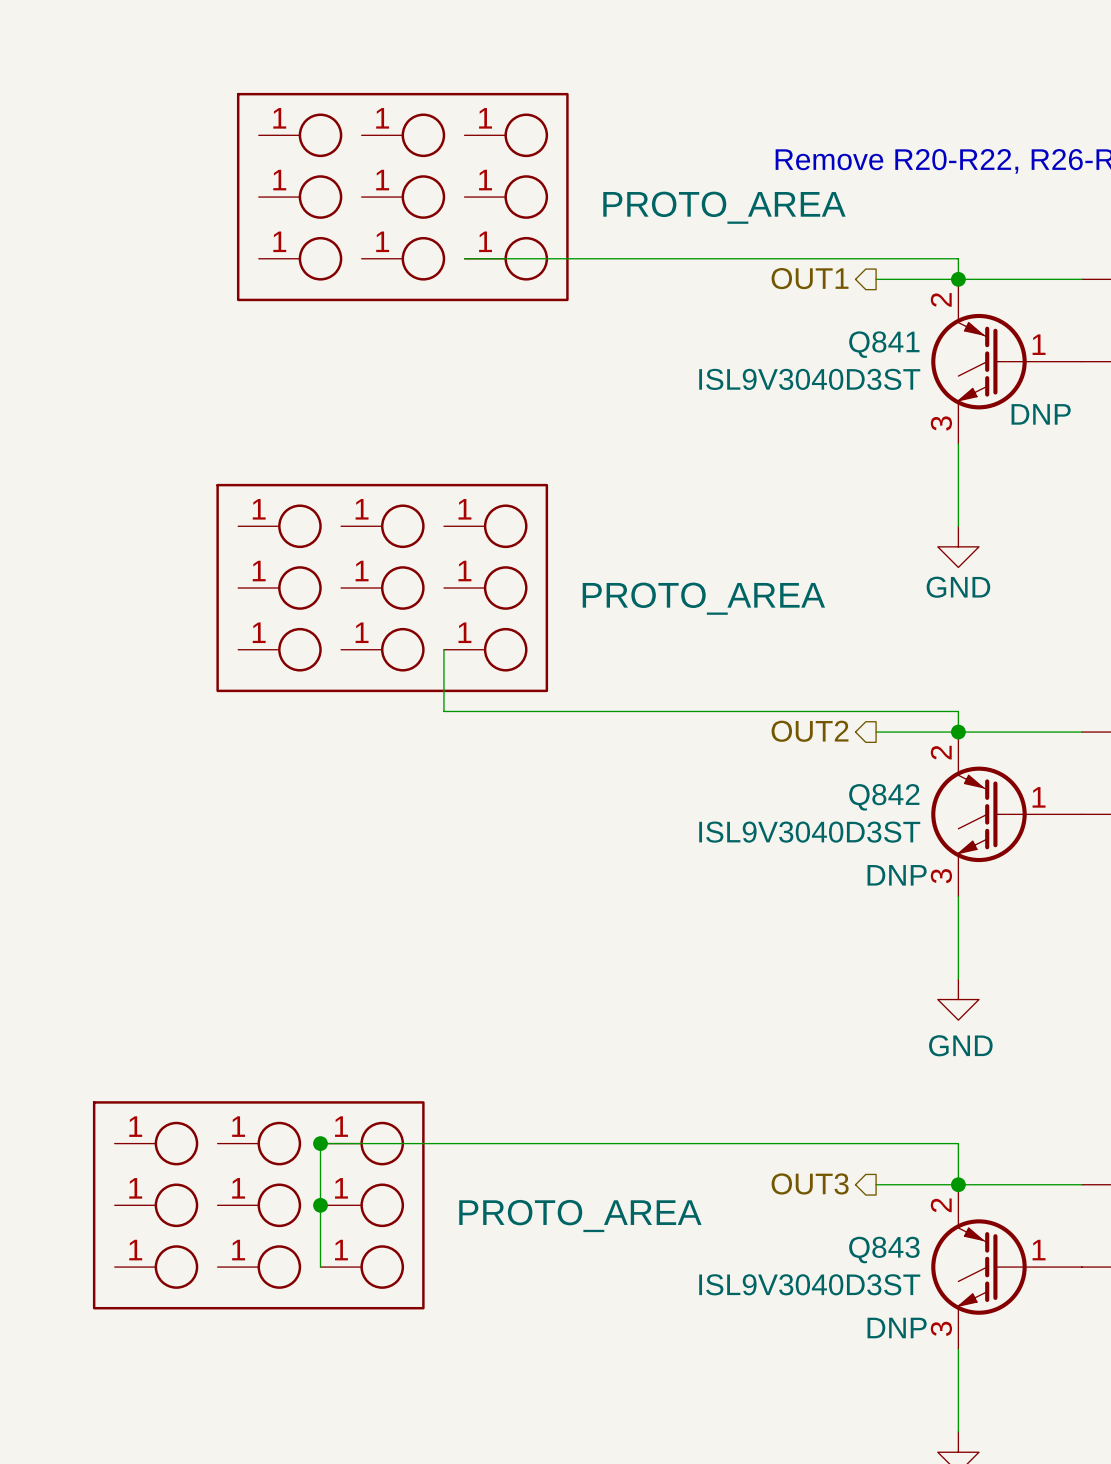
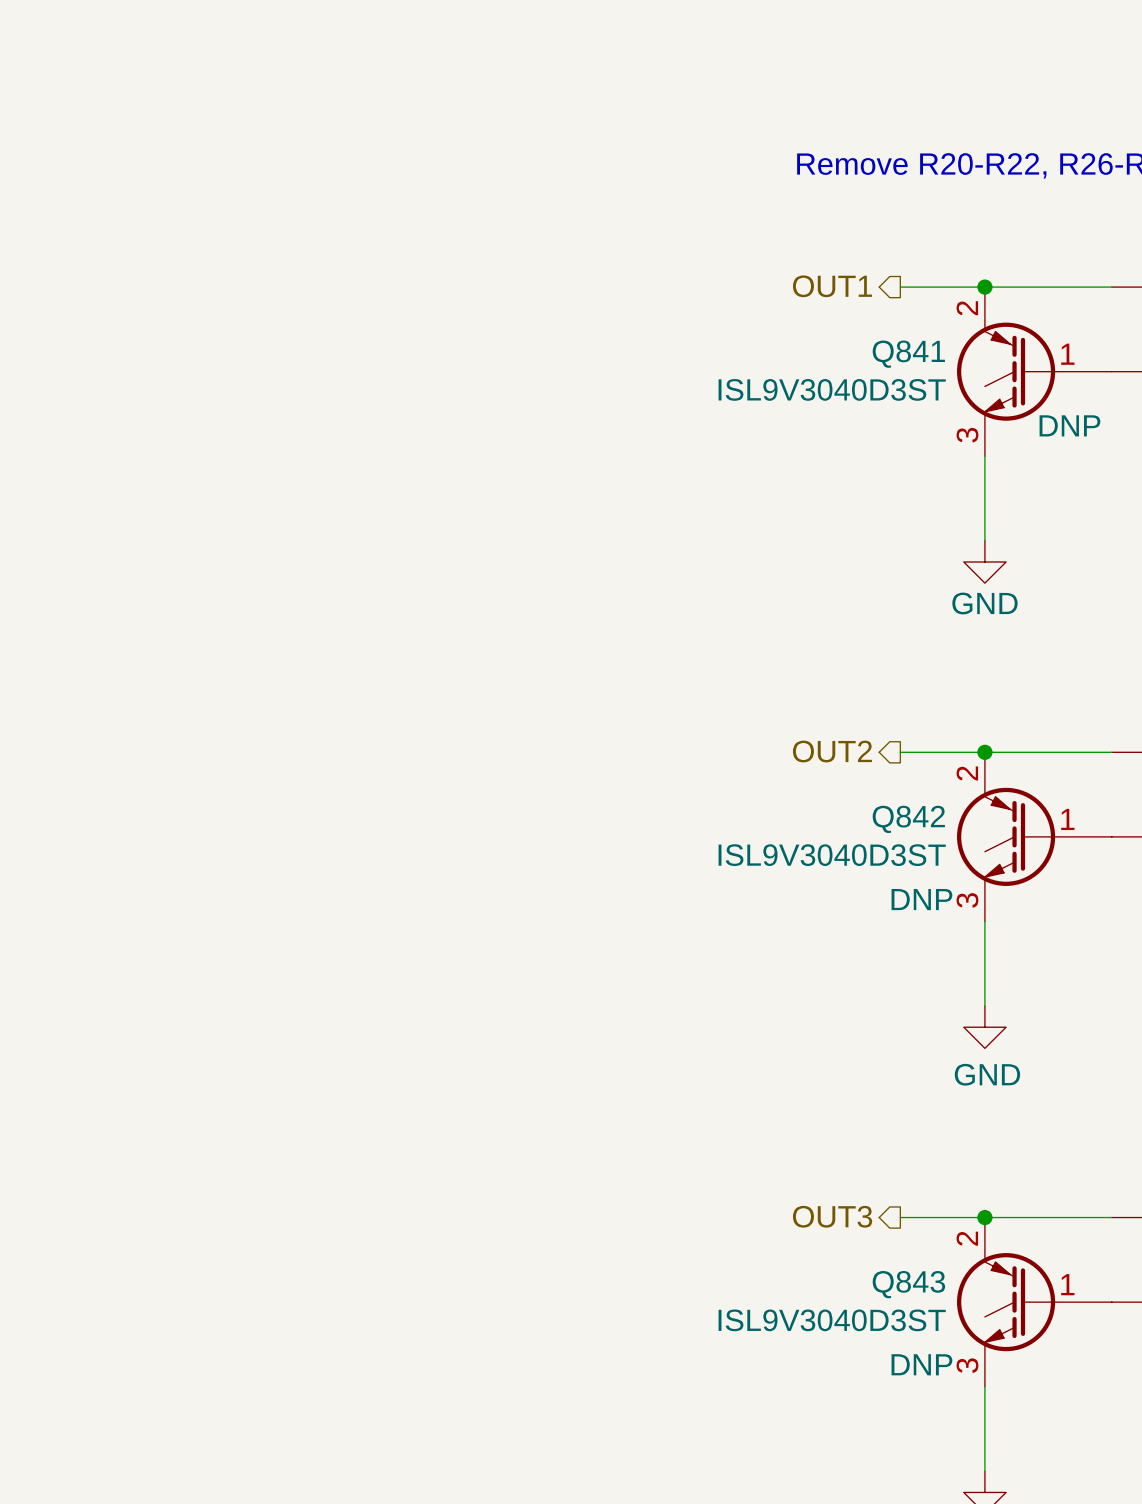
part: PROTO_AREA (402, 197) -> none
wire: (464, 258) (958, 258) (958, 279) -> none
part: PROTO_AREA (382, 588) -> none
wire: (443, 649) (443, 711) (958, 711) (958, 732) -> none
junction: (320, 1143) -> none
wire: (958, 1184) (958, 1143) (320, 1143) (320, 1267) -> none
part: PROTO_AREA (258, 1205) -> none
junction: (320, 1205) -> none

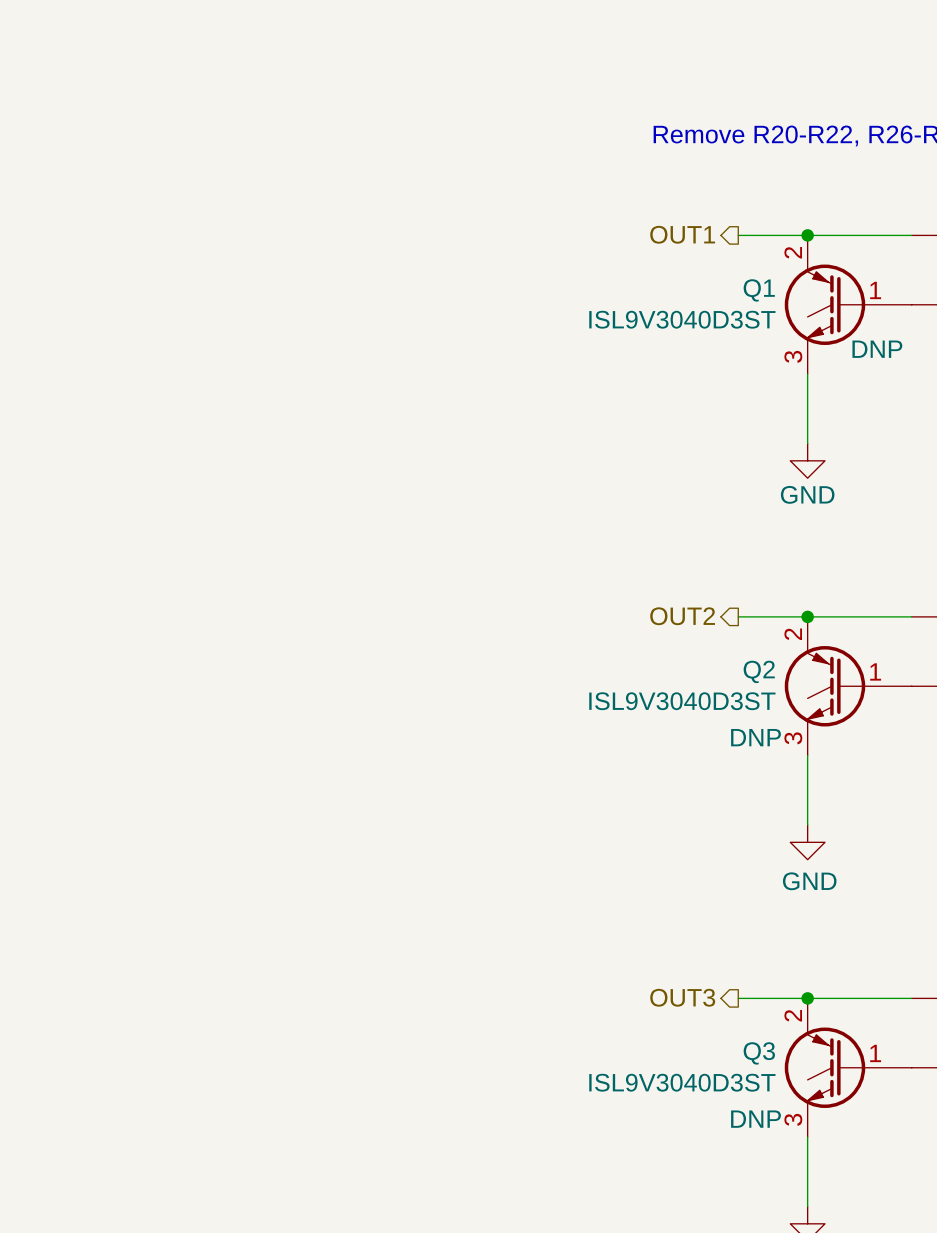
Q841 name: Q841 (908, 354) -> Q1 (759, 290)
Q842 name: Q842 (908, 819) -> Q2 (759, 671)
Q843 name: Q843 (908, 1284) -> Q3 (759, 1053)

